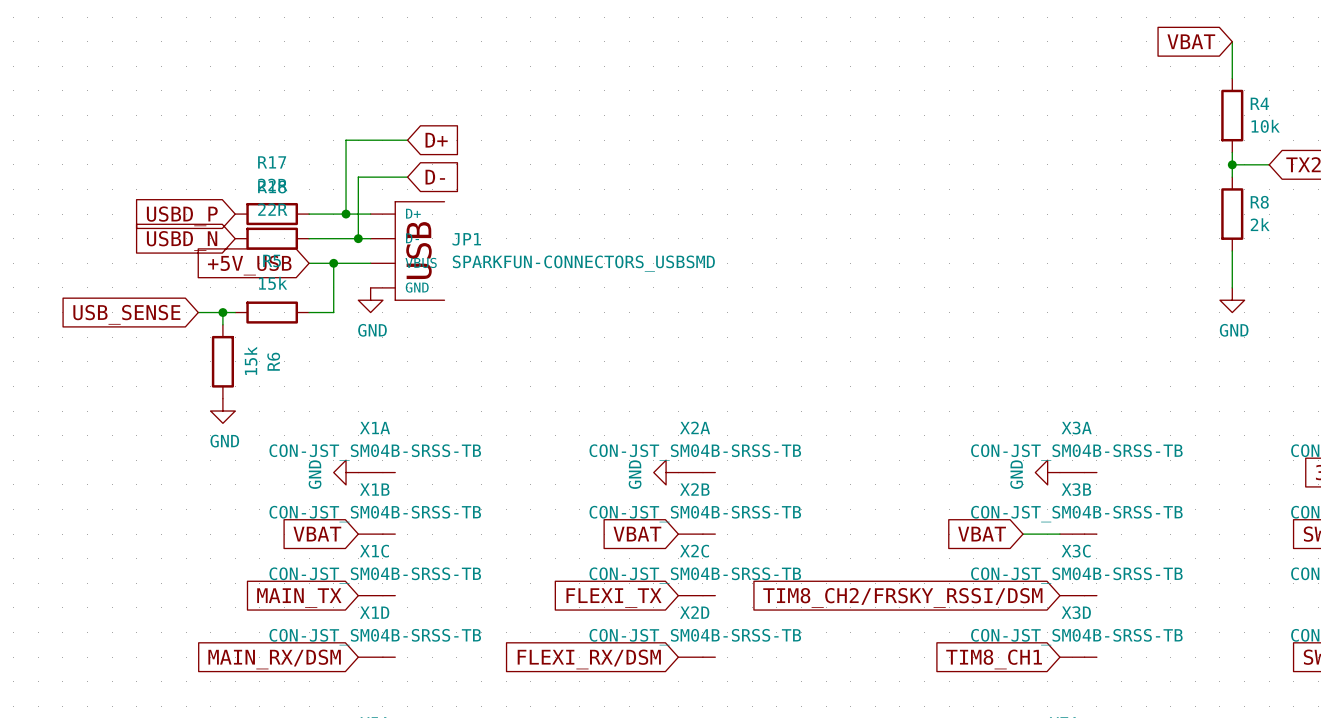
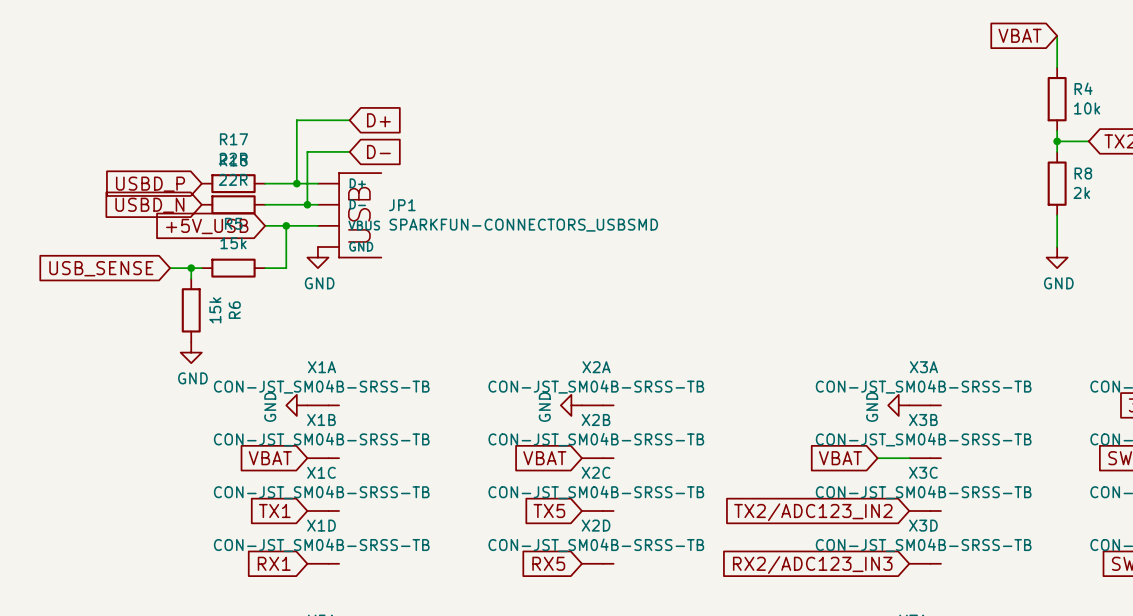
global label: TIM8_CH2/FRSKY_RSSI/DSM (902, 597) -> TX2/ADC123_IN2 (813, 512)
global label: MAIN_TX (299, 598) -> TX1 (274, 510)
global label: FLEXI_TX (614, 598) -> TX5 (549, 510)
global label: MAIN_RX/DSM (274, 659) -> RX1 (274, 563)
global label: FLEXI_RX/DSM (589, 659) -> RX5 (548, 563)
global label: TIM8_CH1 (994, 659) -> RX2/ADC123_IN3 (812, 565)

